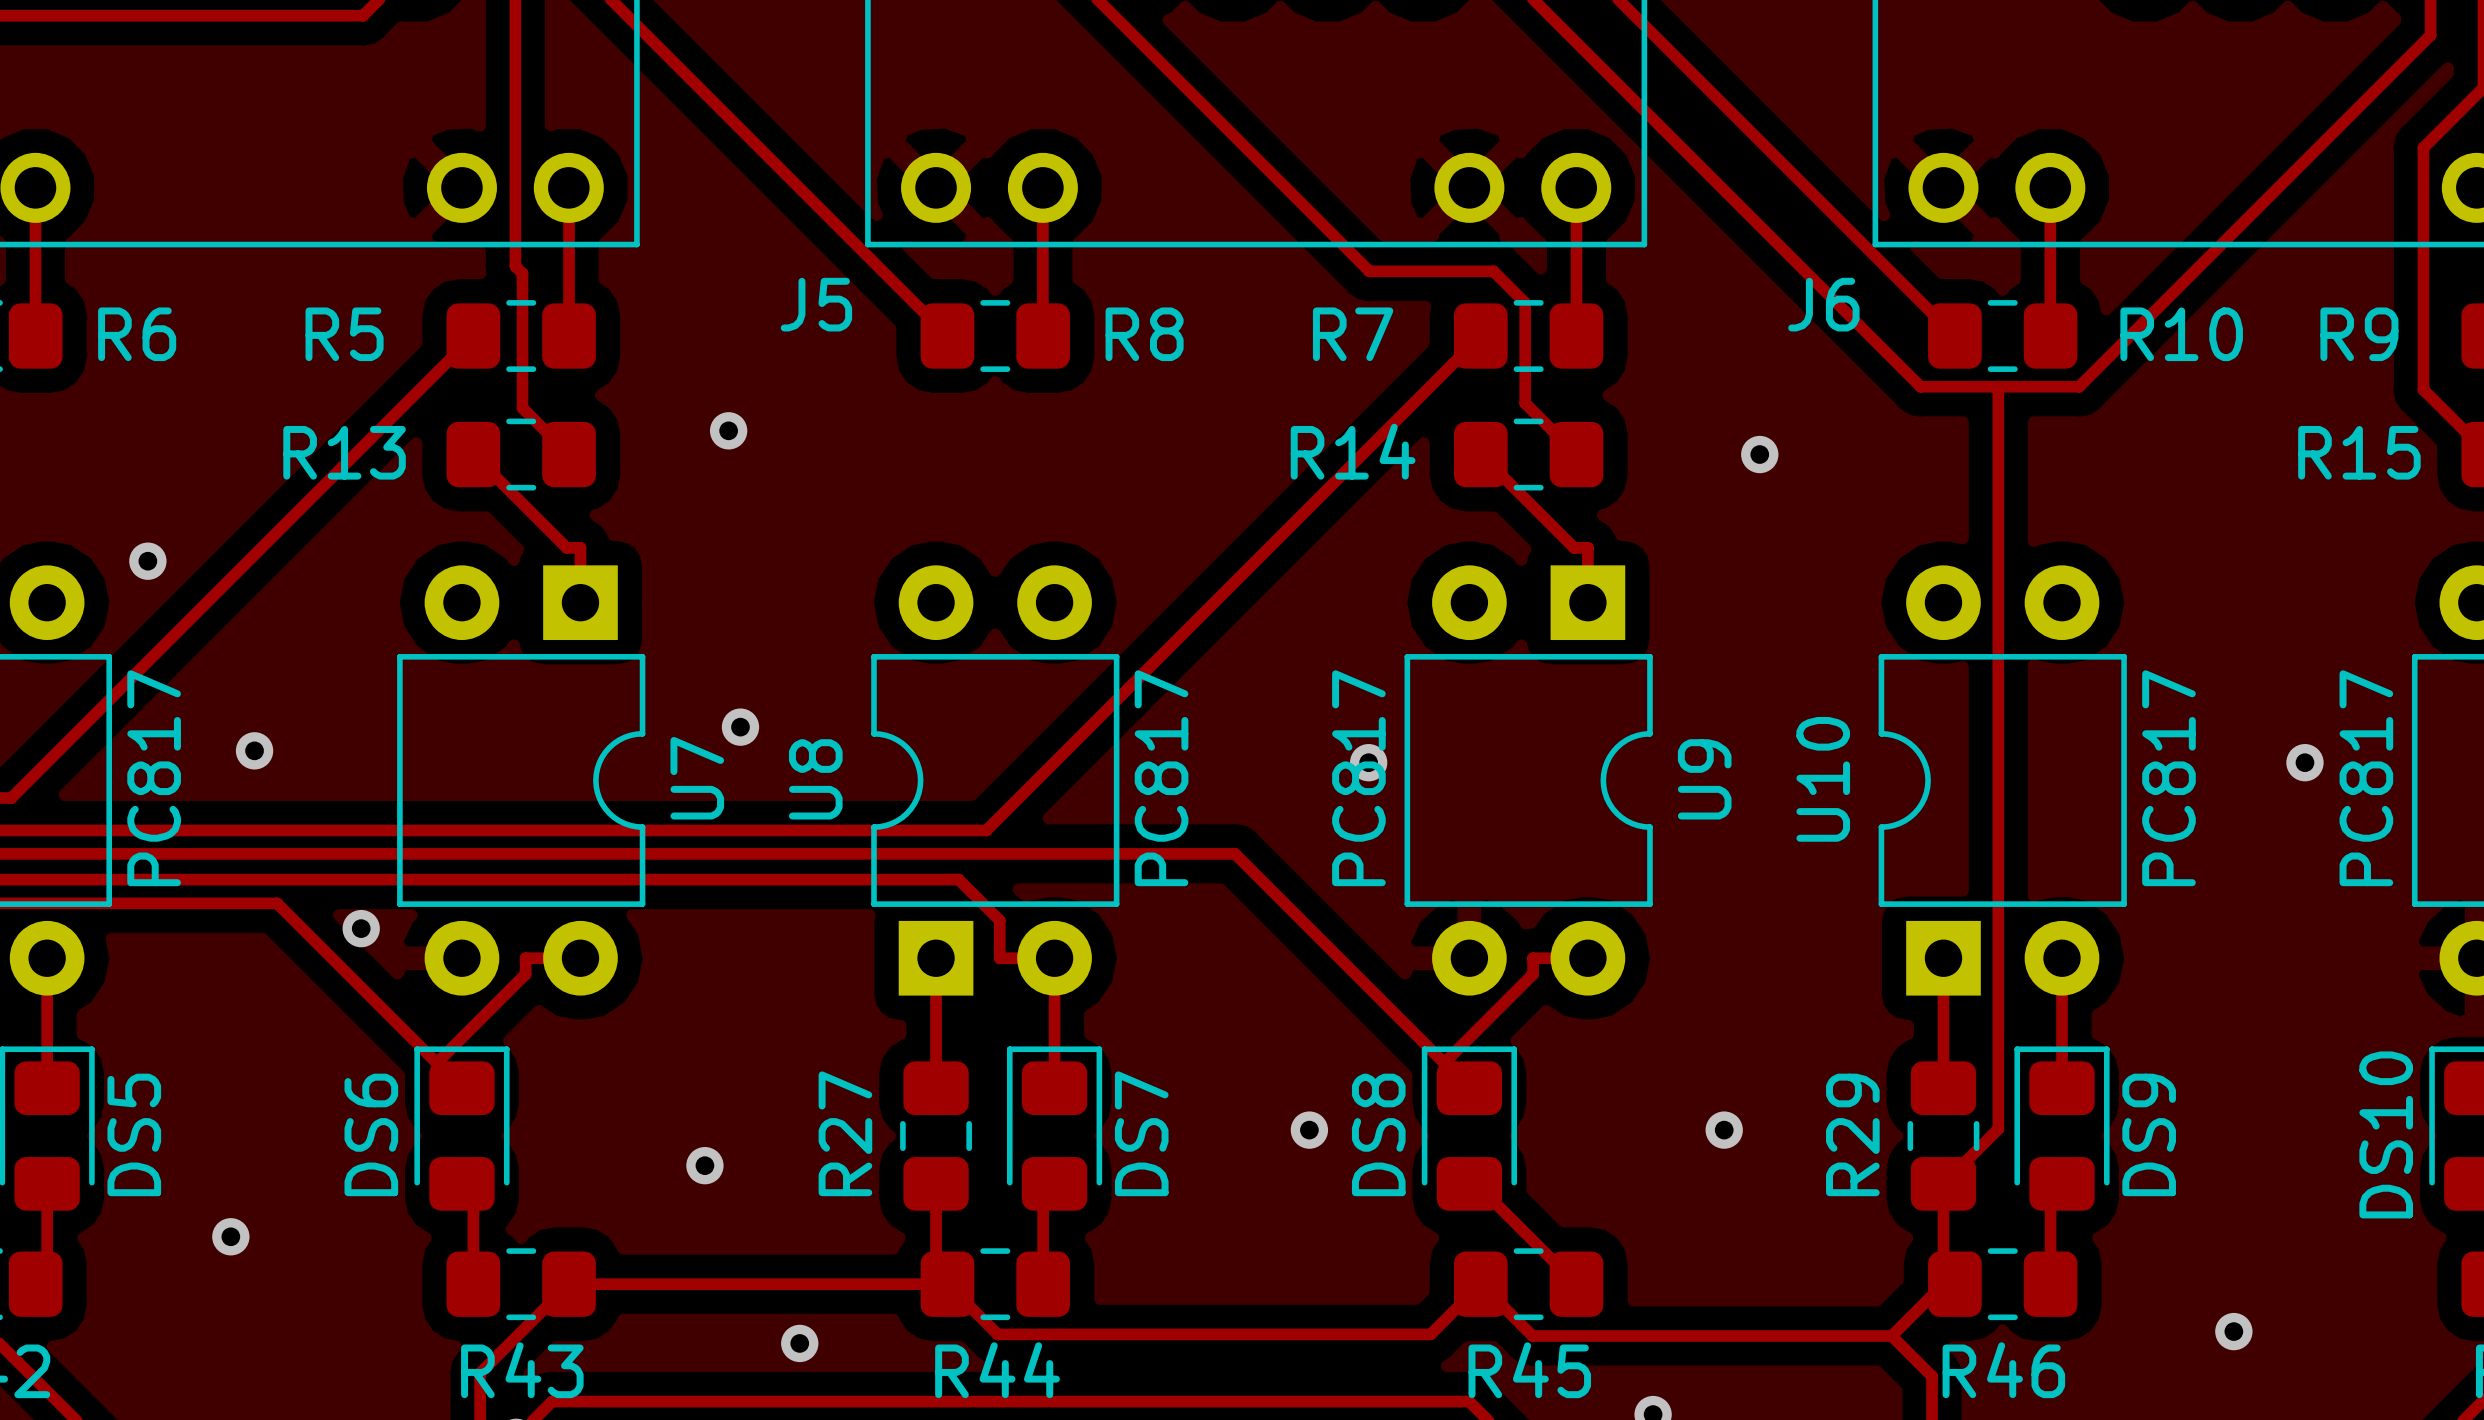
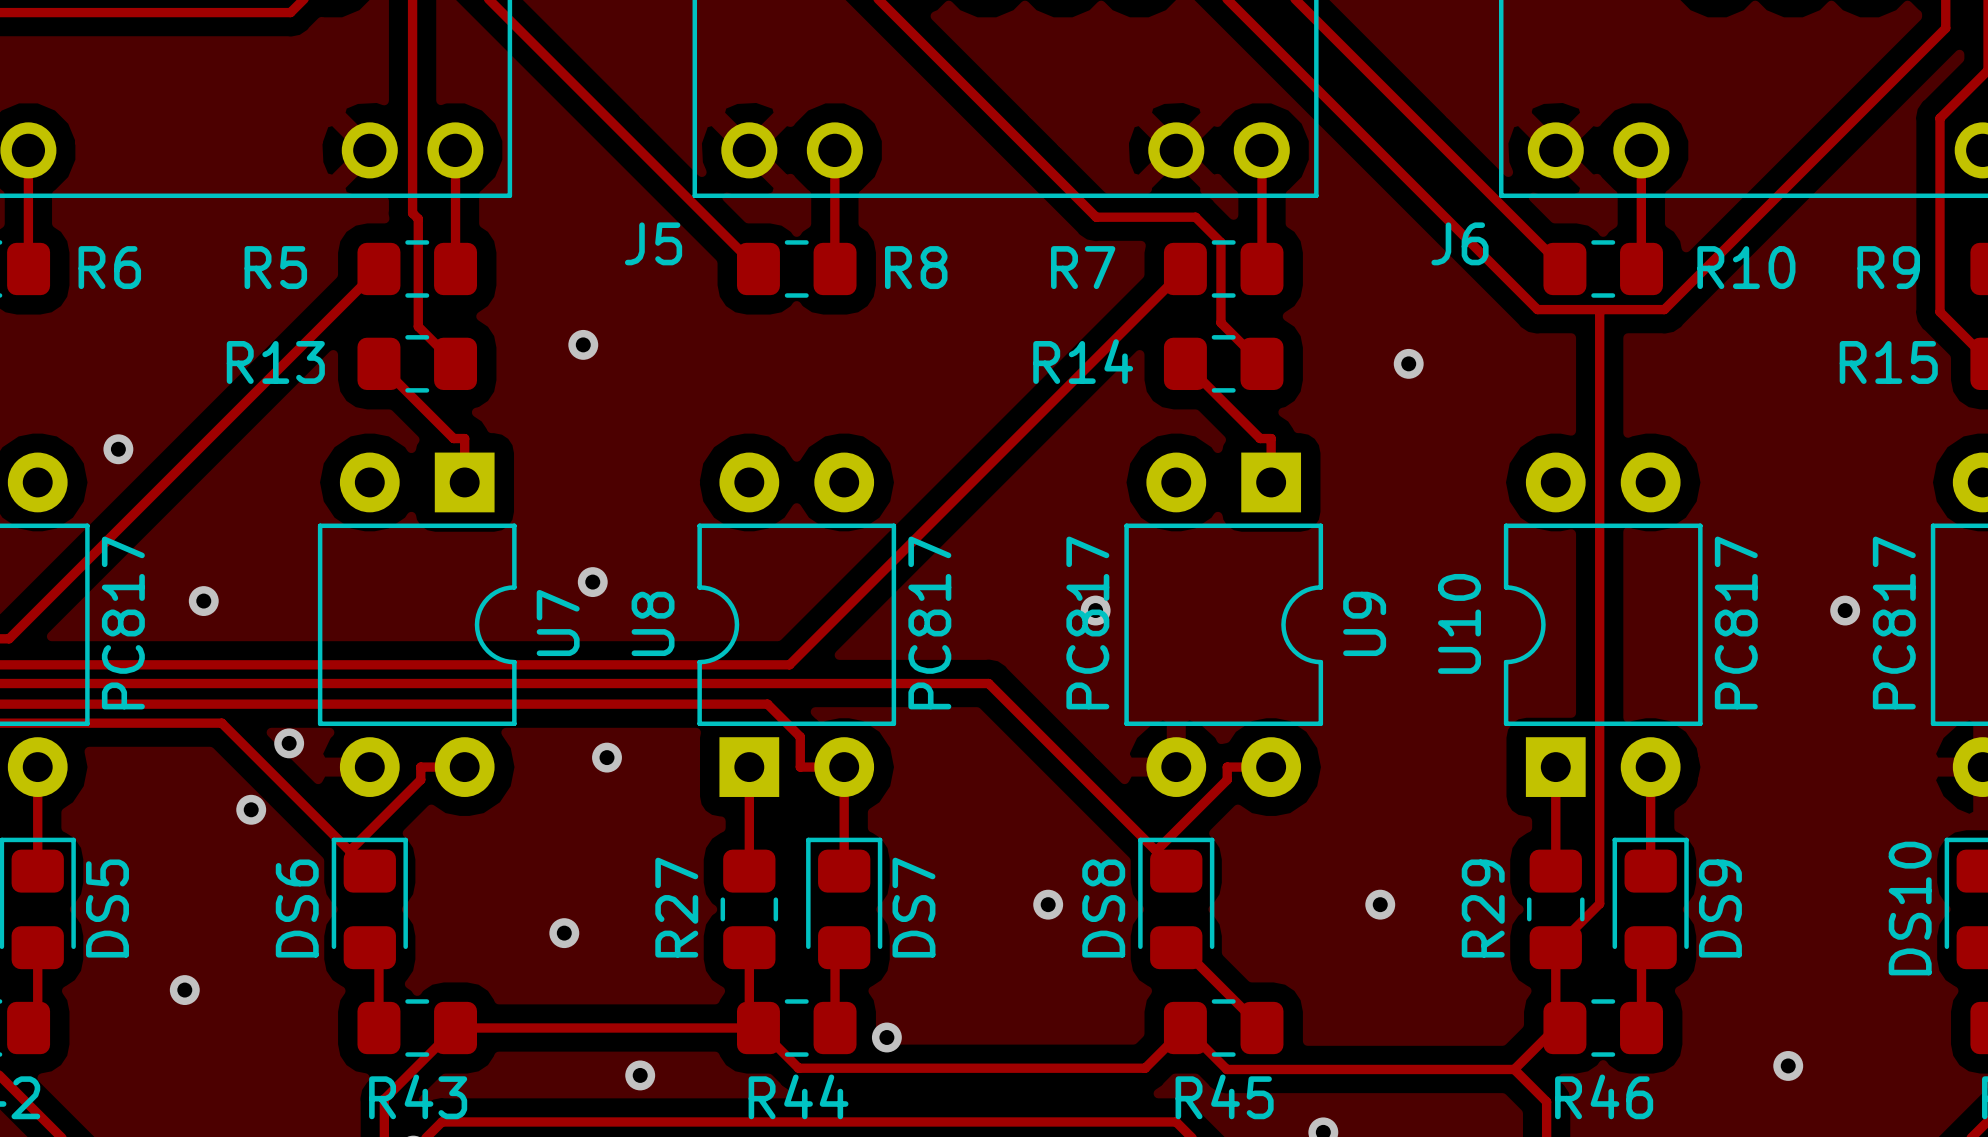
via: none -> (607, 757)
via: none -> (251, 809)
via: none -> (886, 1037)

